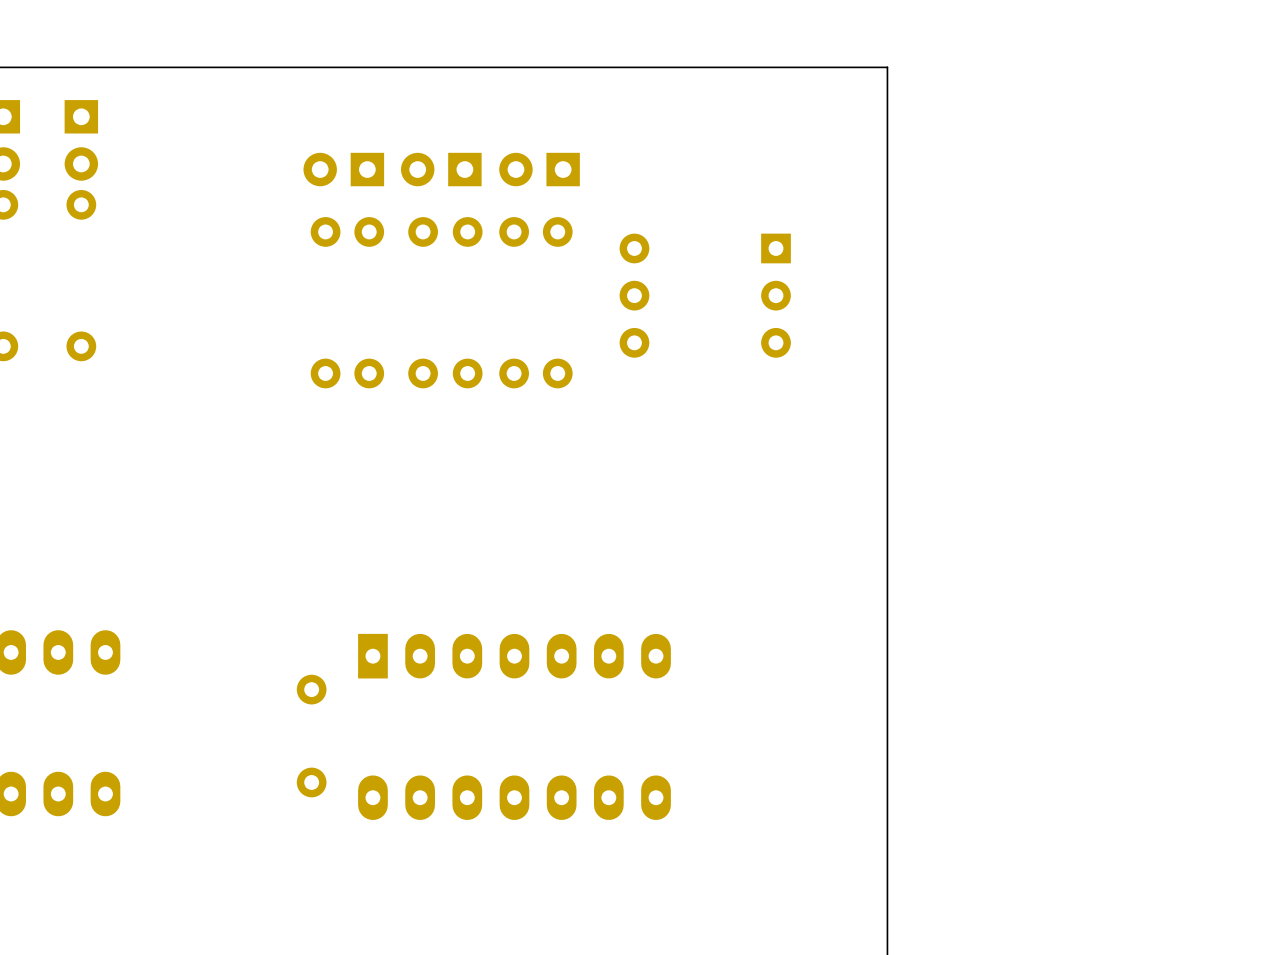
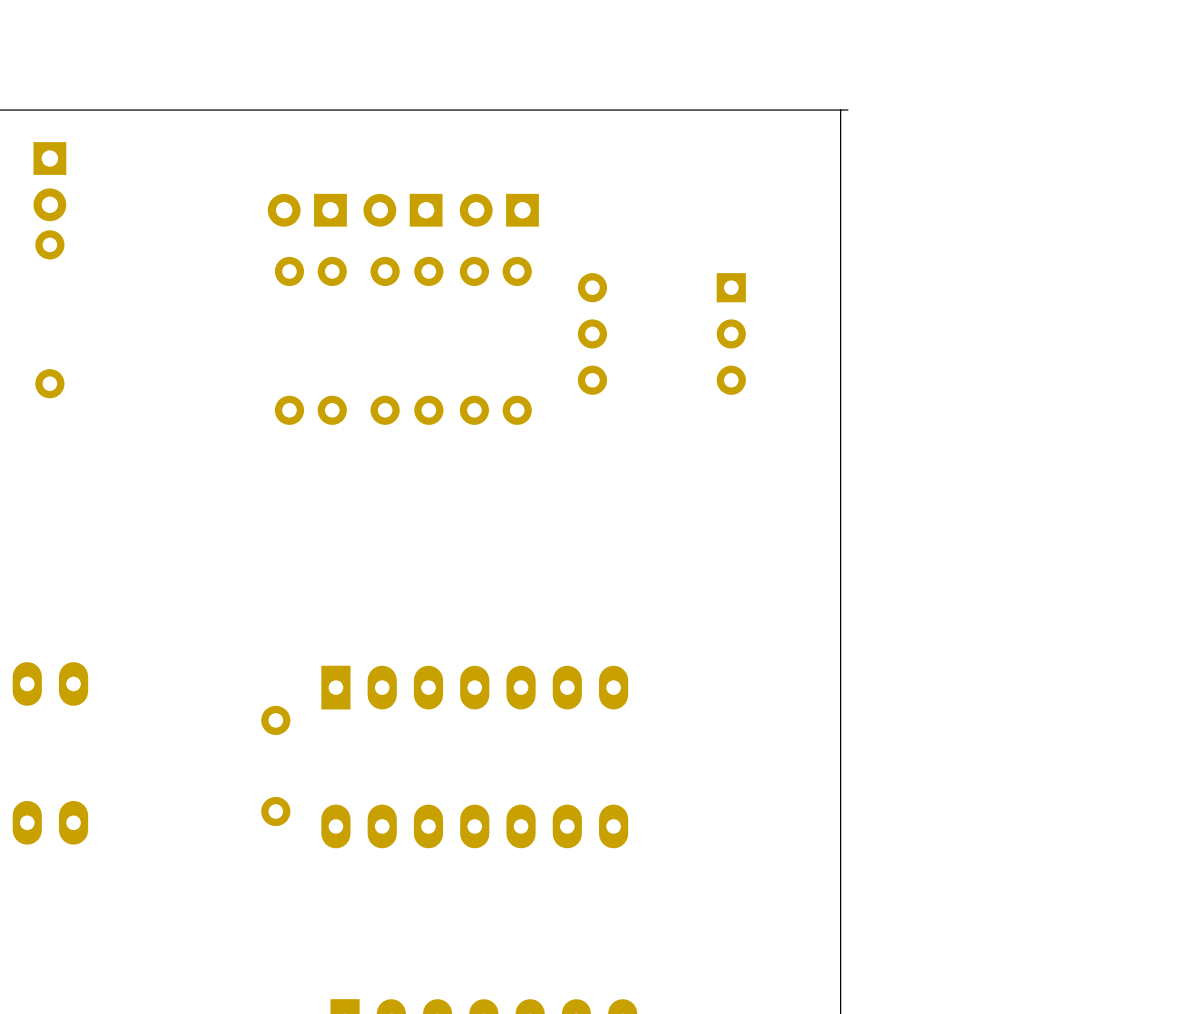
board edge: none -> (847, 110) (840, 110)

